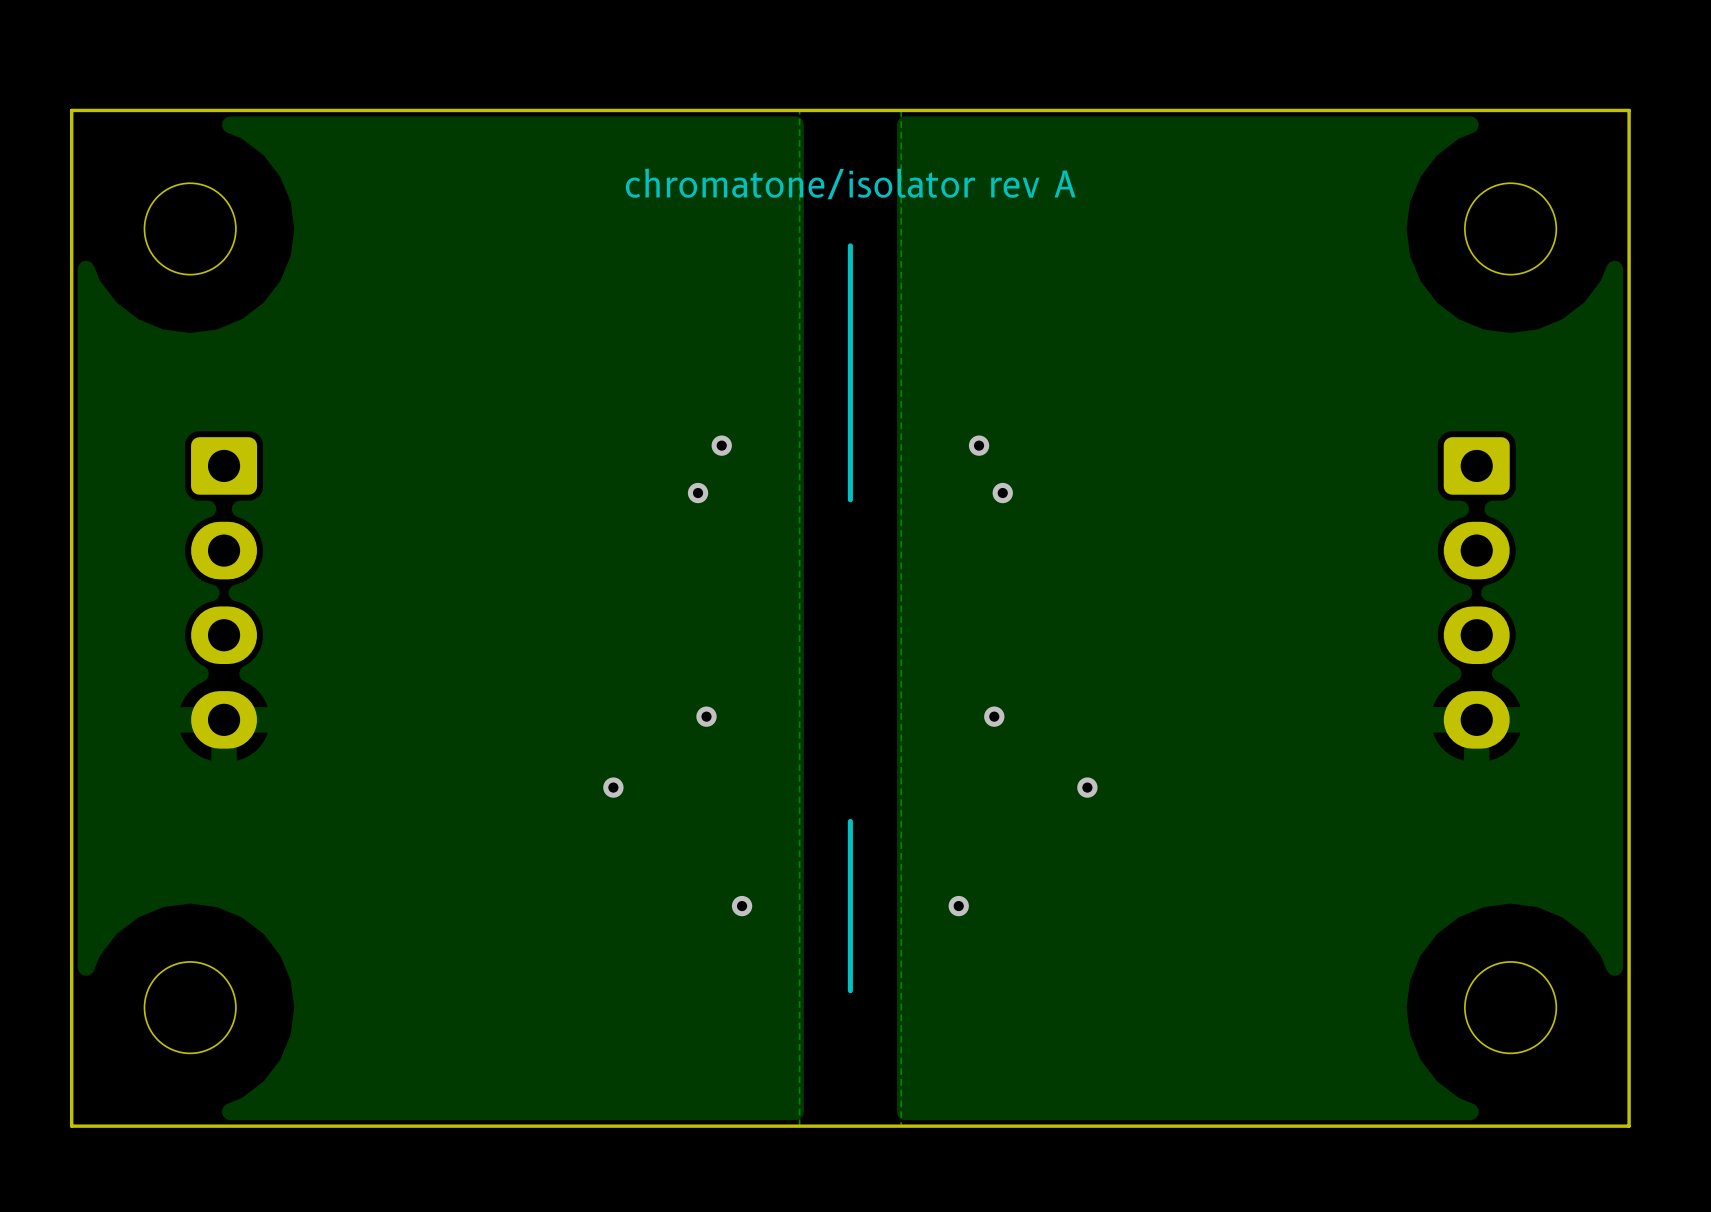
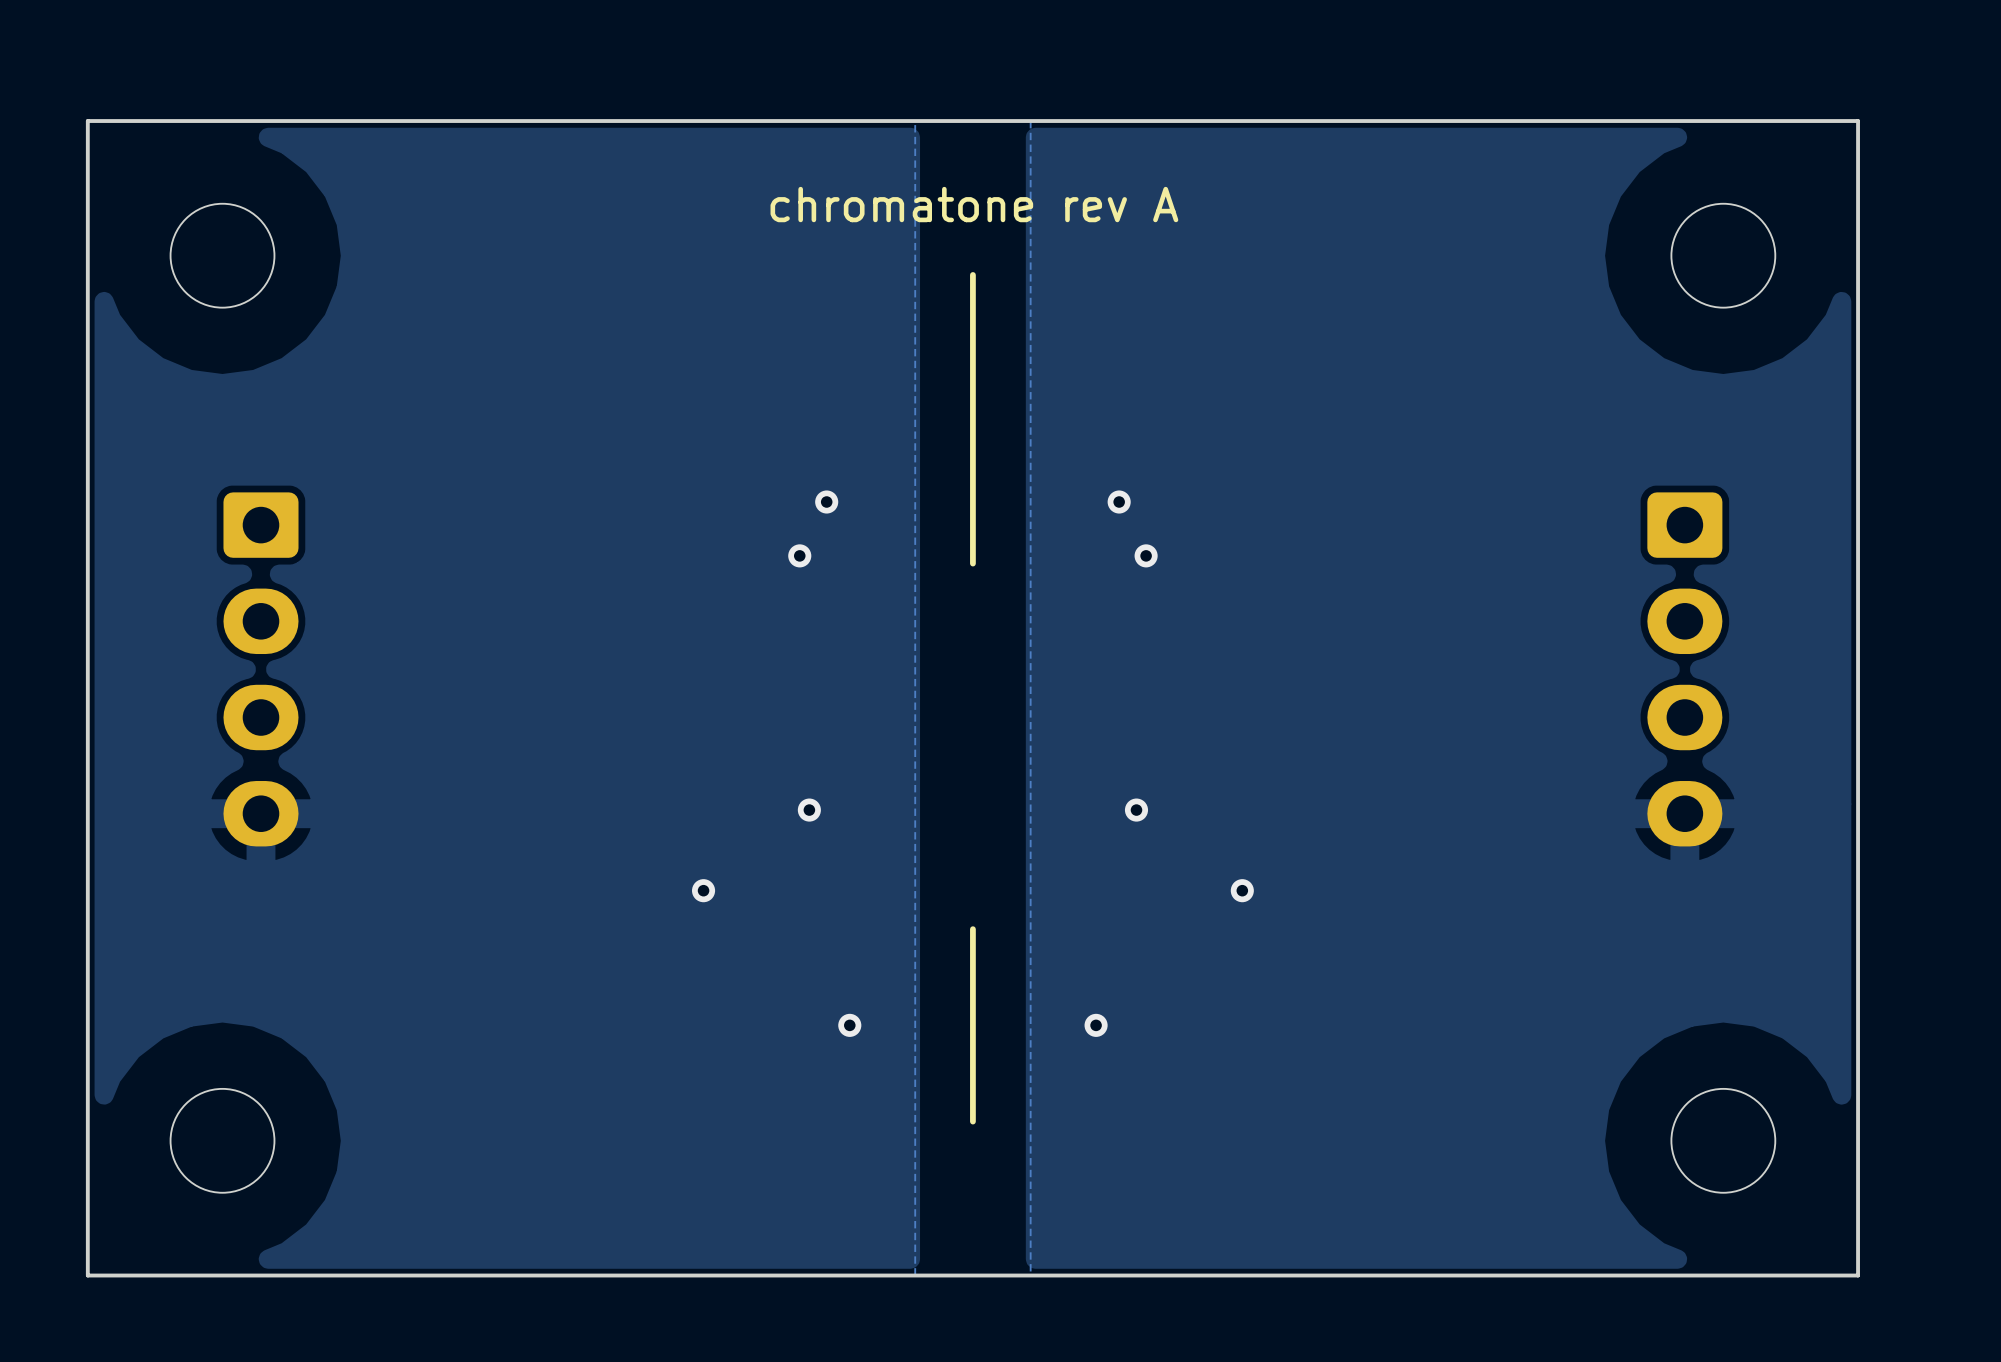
text: chromatone/isolator rev A (850, 183) -> chromatone rev A (974, 204)

